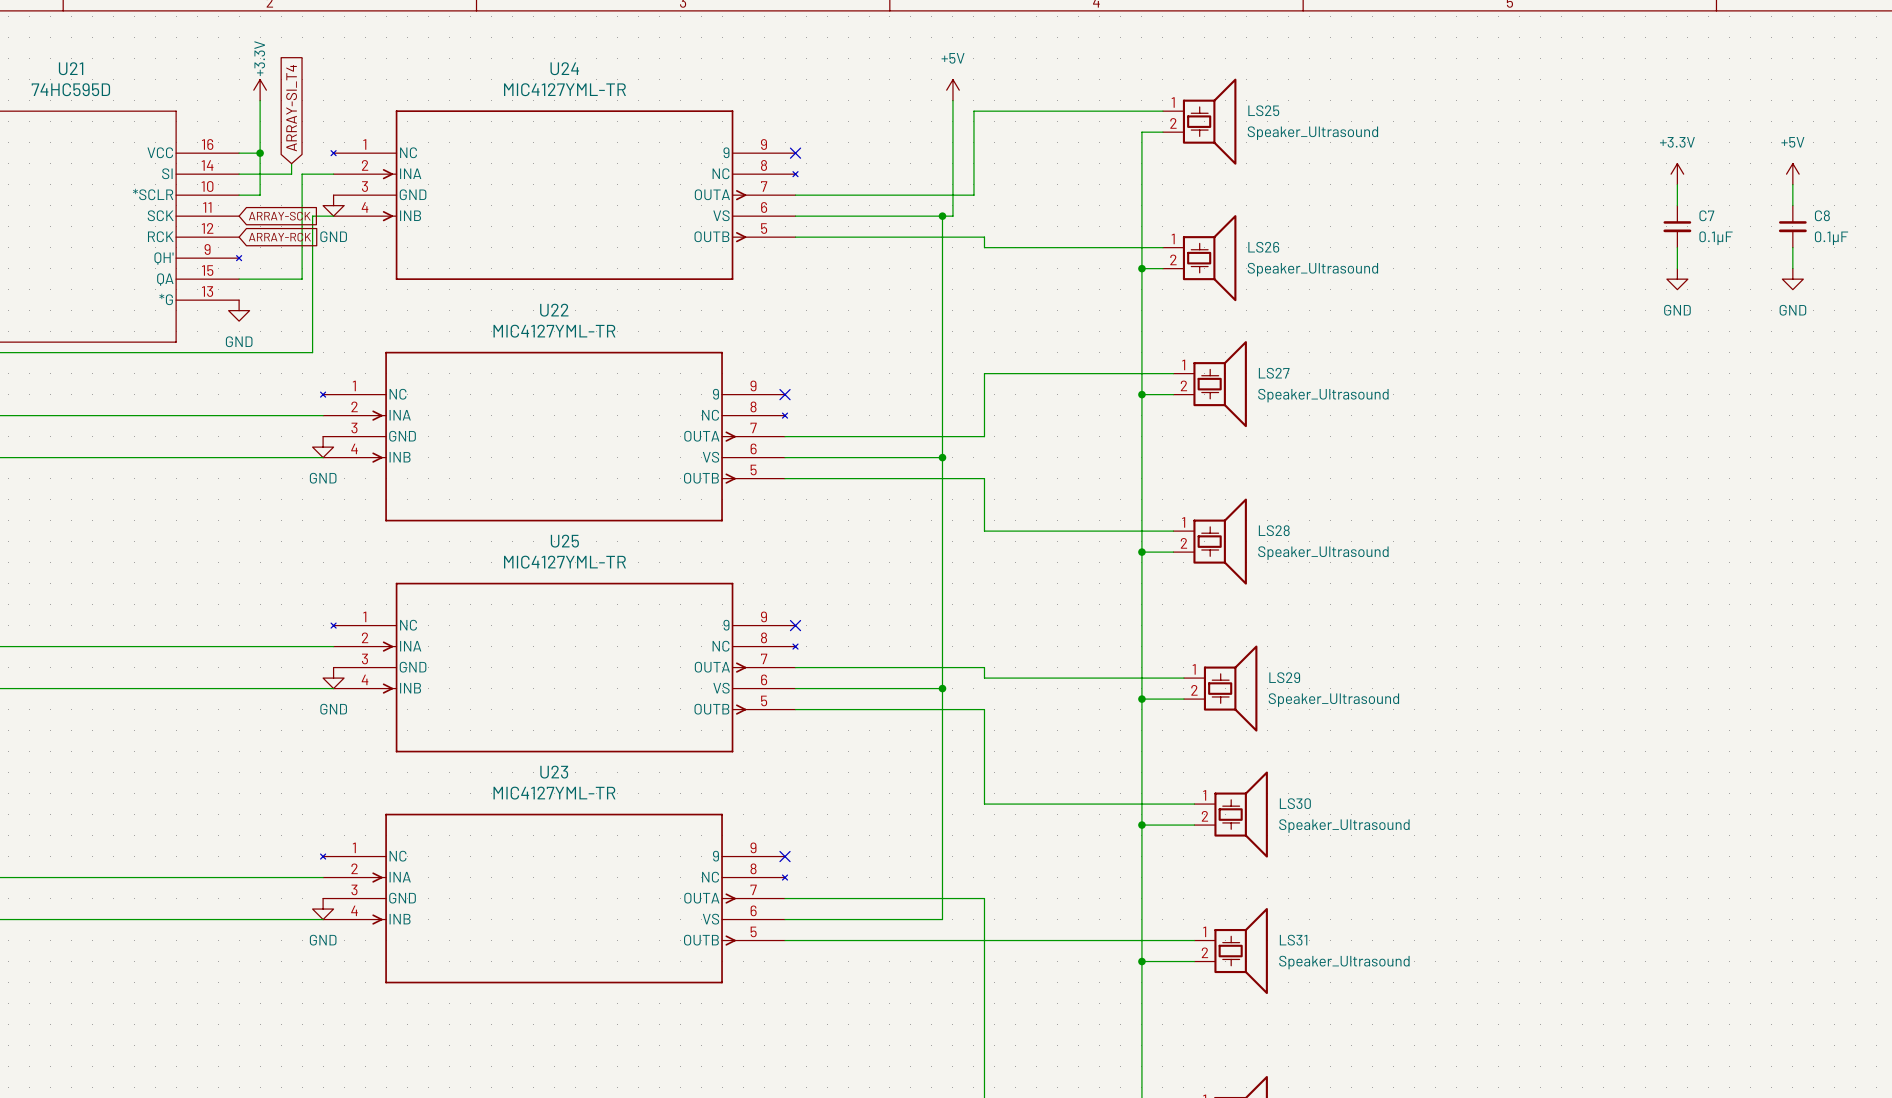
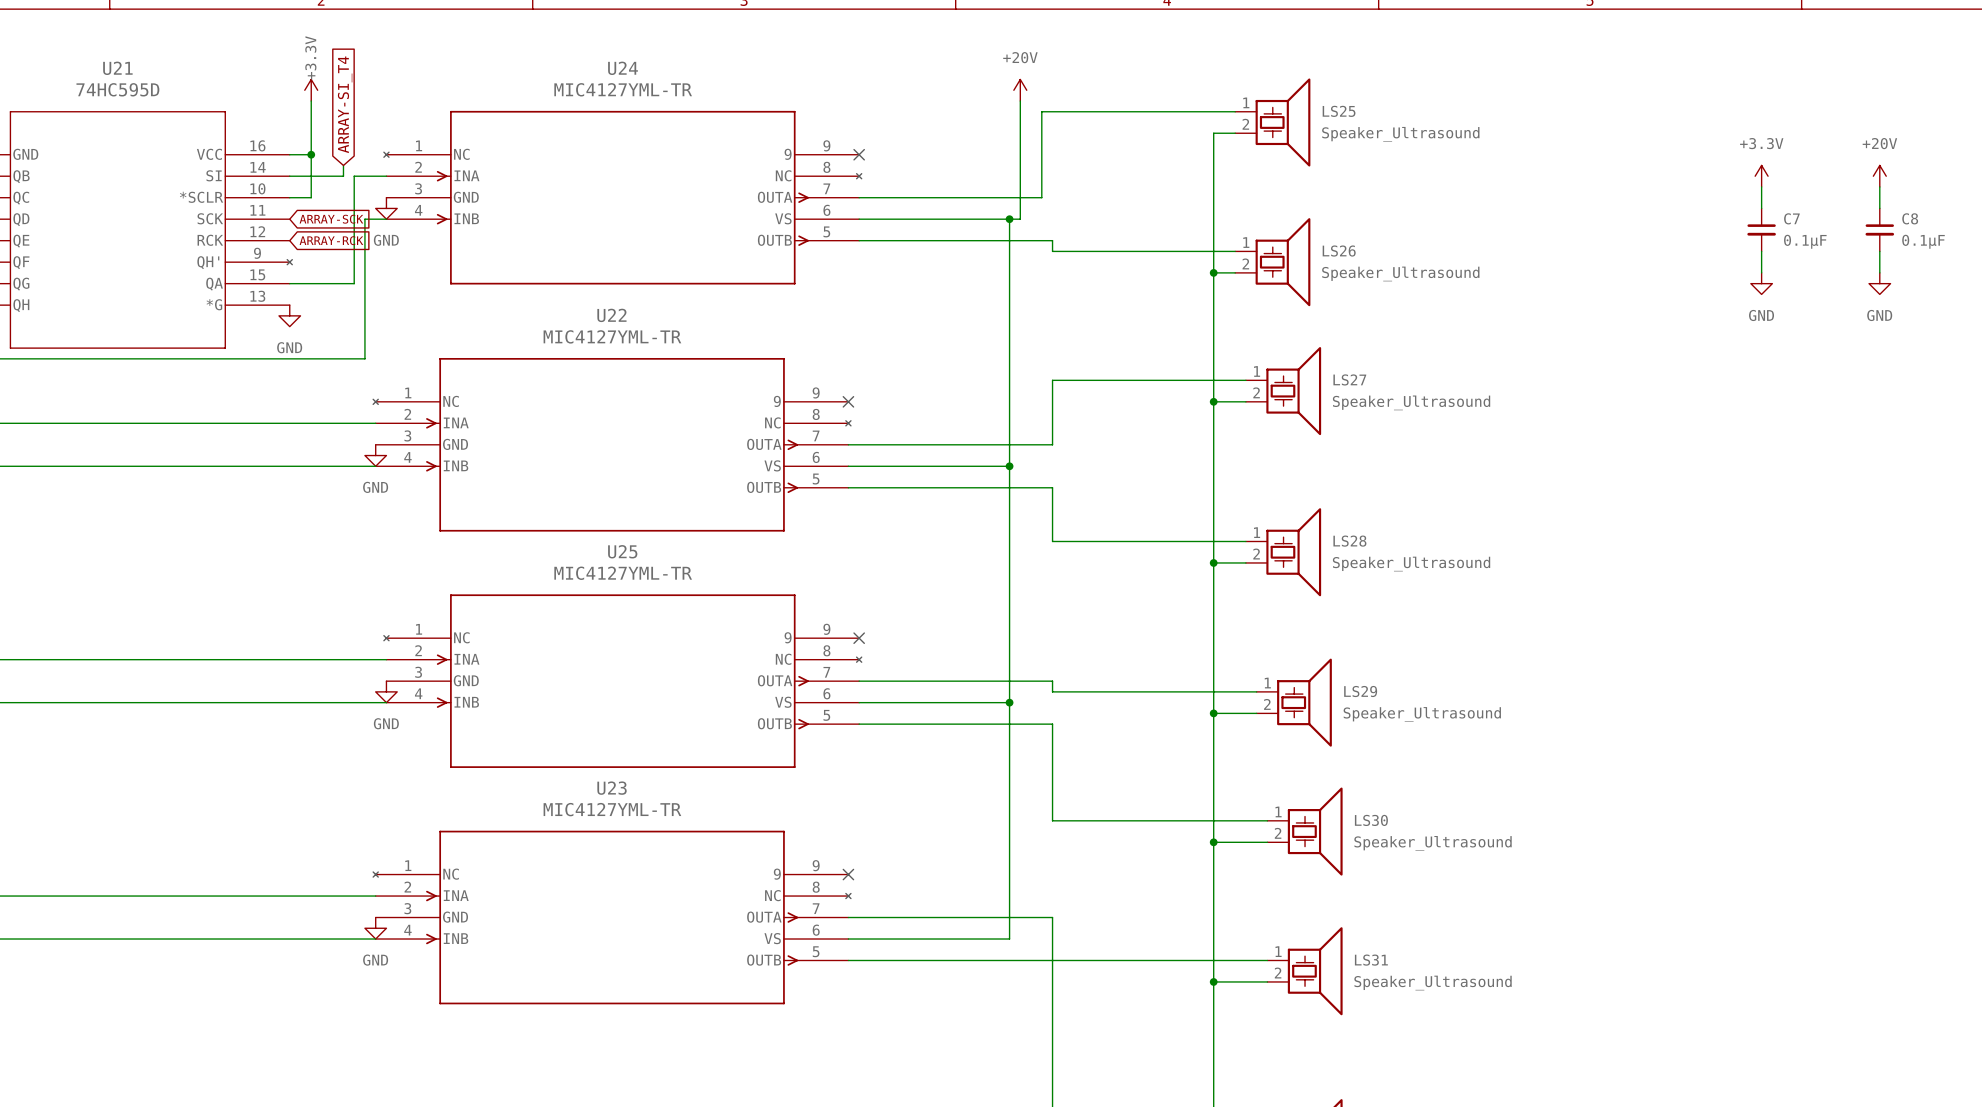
power symbol: +5V (952, 90) -> +20V (1020, 90)
power symbol: +5V (1792, 174) -> +20V (1879, 176)

